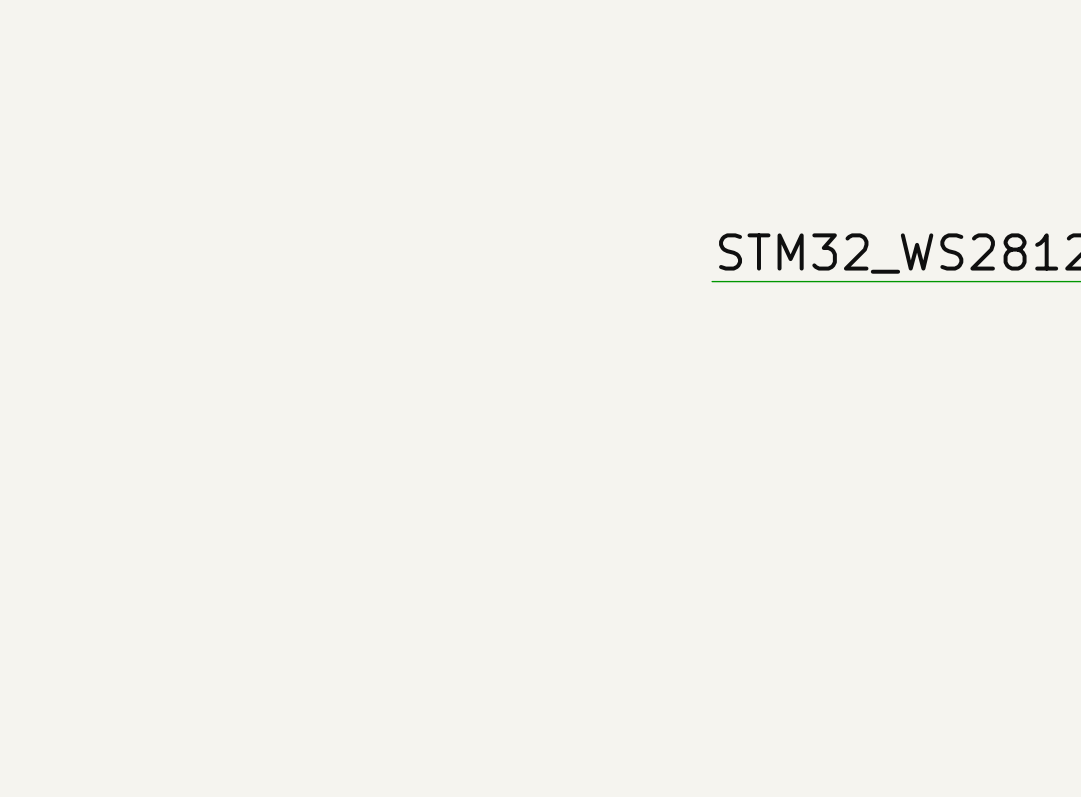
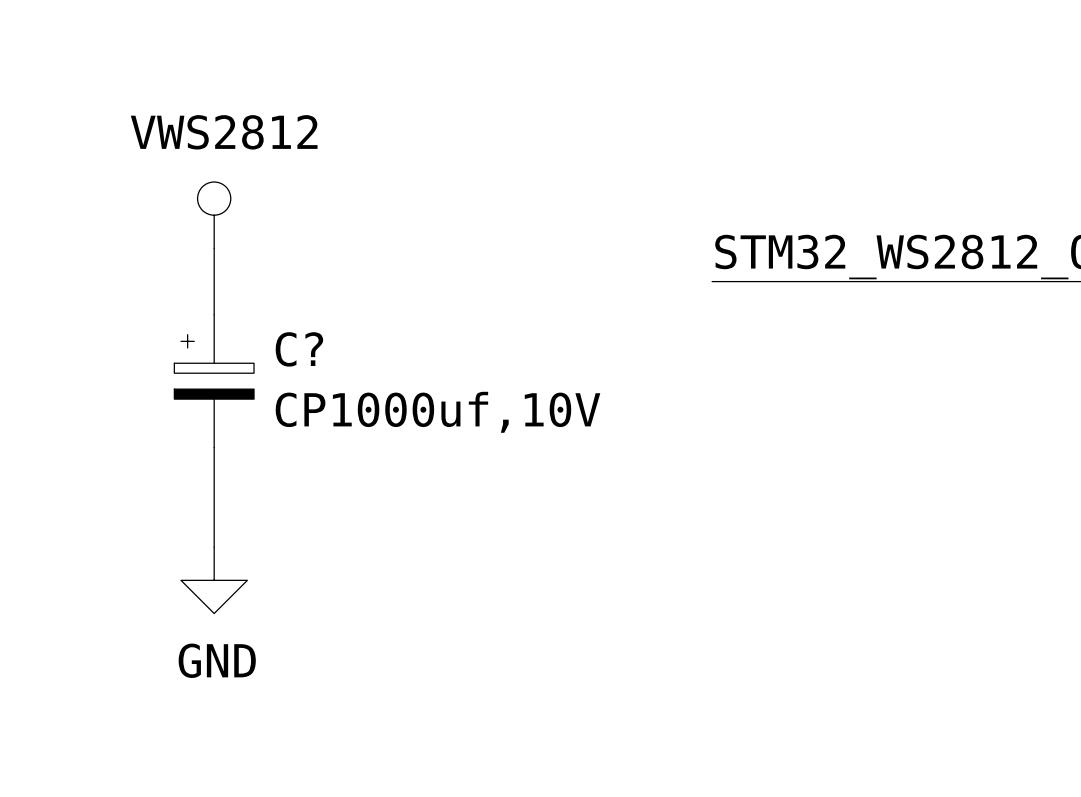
power symbol: none -> VWS2812 (214, 215)
wire: none -> (214, 248) (214, 314)
C?: none -> CP1000uf,10V (214, 381)
wire: none -> (214, 447) (214, 547)
power symbol: none -> GND (214, 580)

